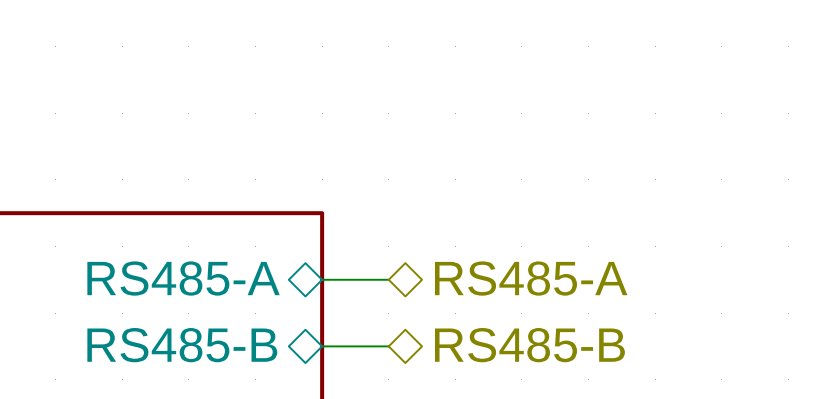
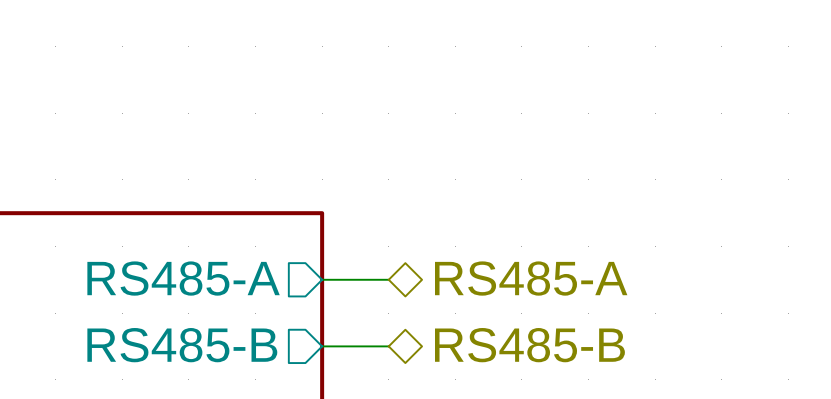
sheet pin shape: bidirectional (183, 278) -> output (183, 278)
sheet pin shape: bidirectional (182, 345) -> output (182, 345)

